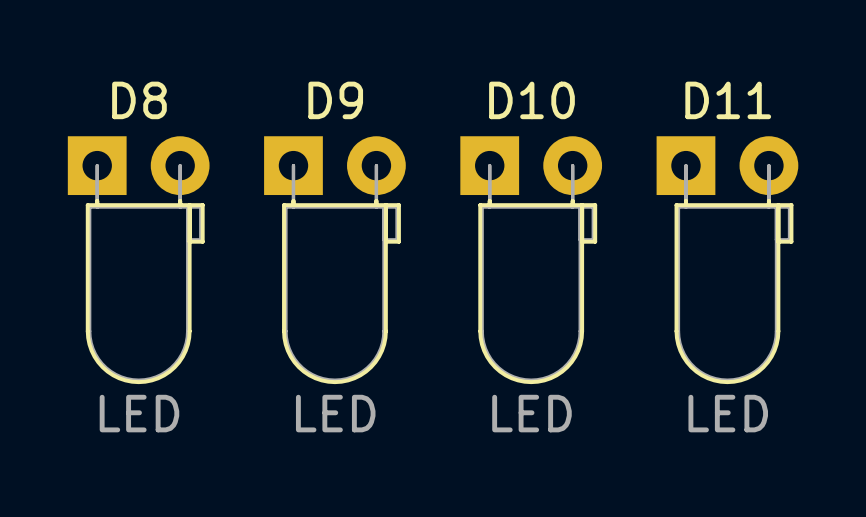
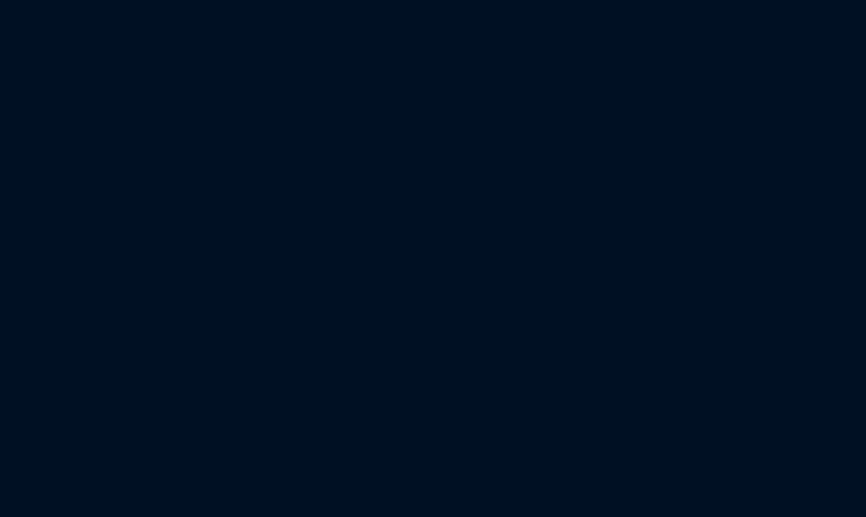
D8: LED (138, 260) -> none
D9: LED (334, 260) -> none
D10: LED (531, 260) -> none
D11: LED (727, 260) -> none

